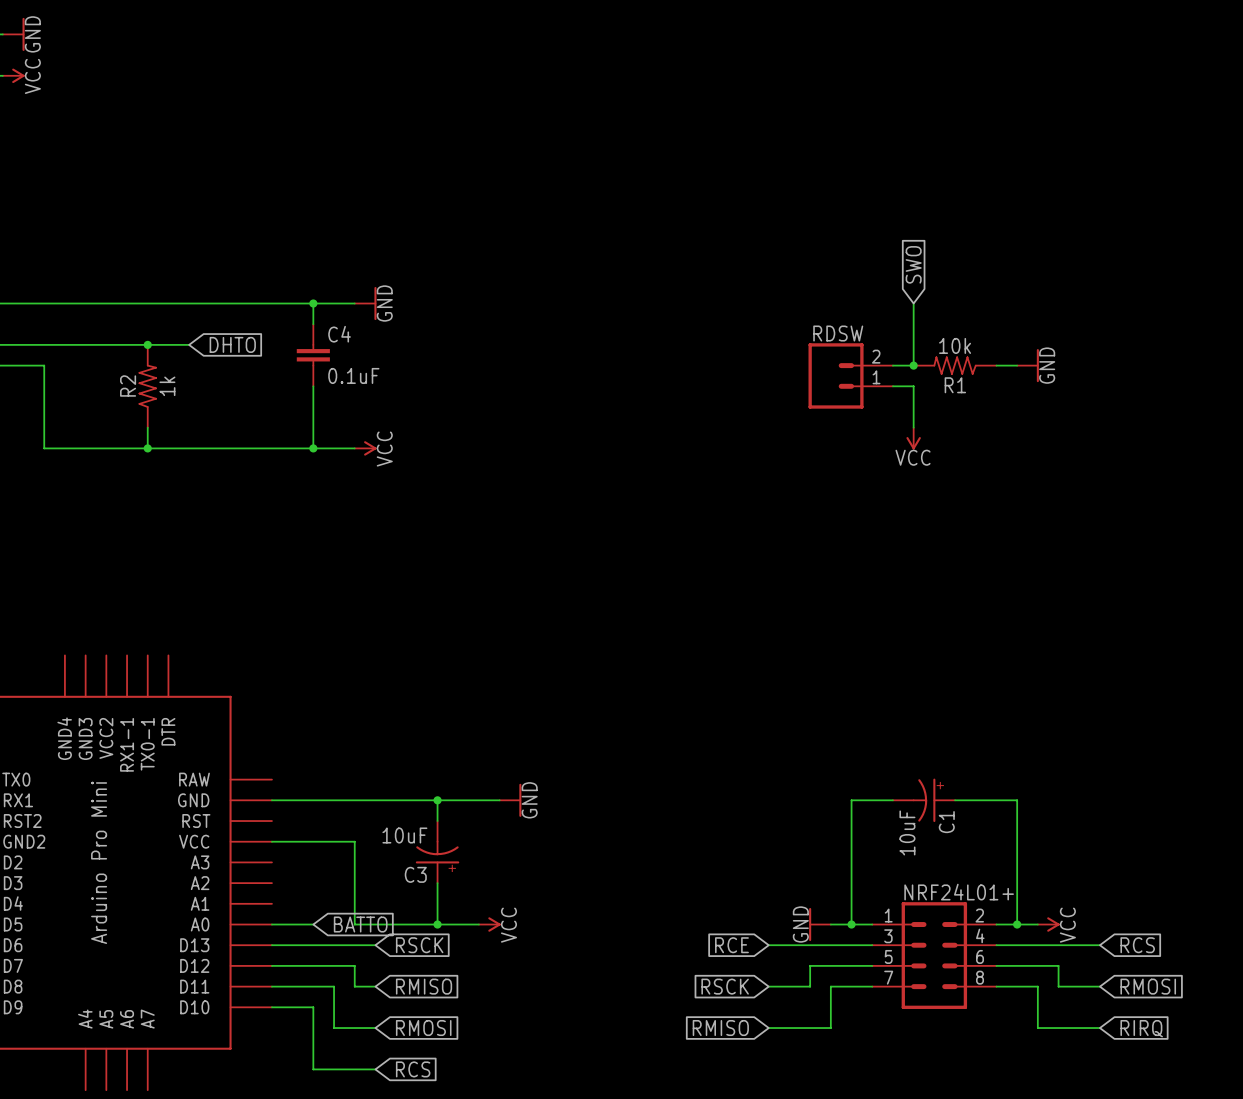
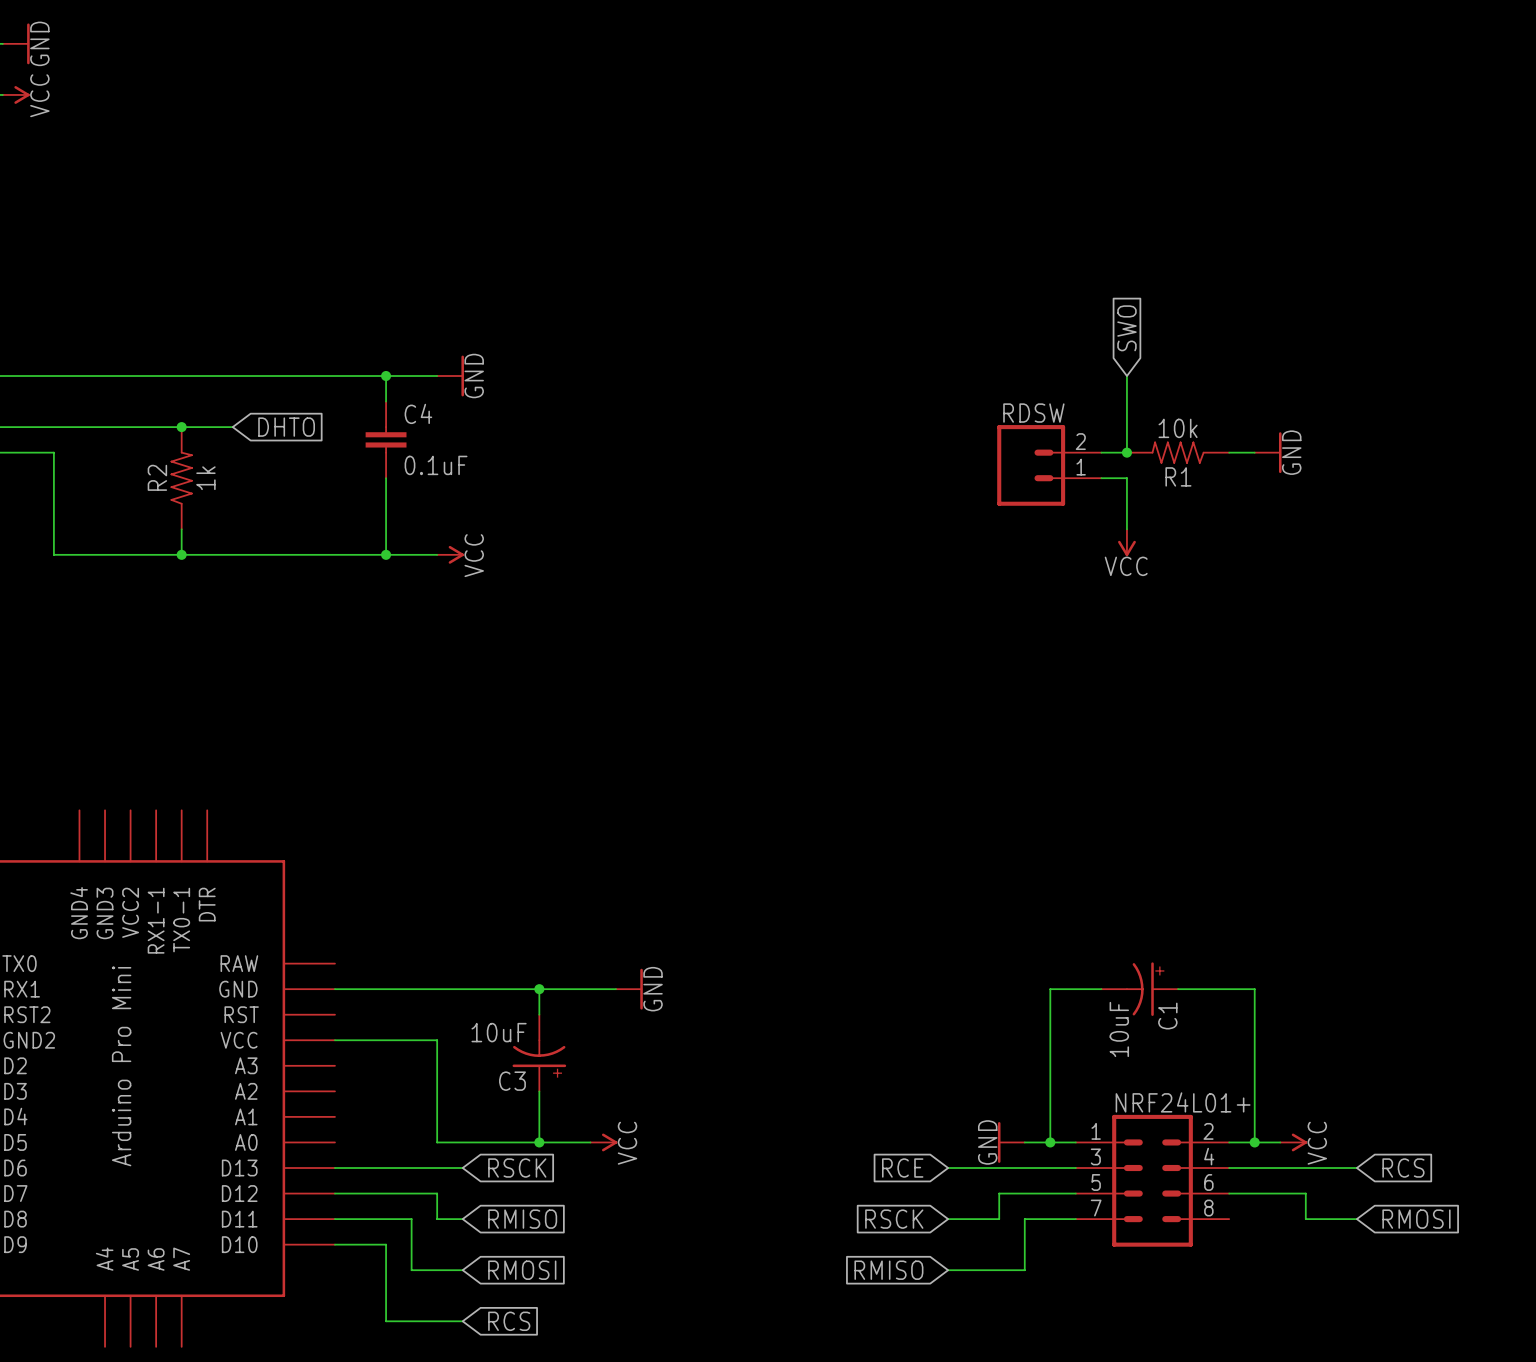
wire: (271, 924) (313, 924) -> none
global label: BATTO (360, 924) -> none
wire: (996, 986) (1037, 986) (1037, 1028) (1099, 1028) -> none
global label: RIRQ (1141, 1028) -> none

